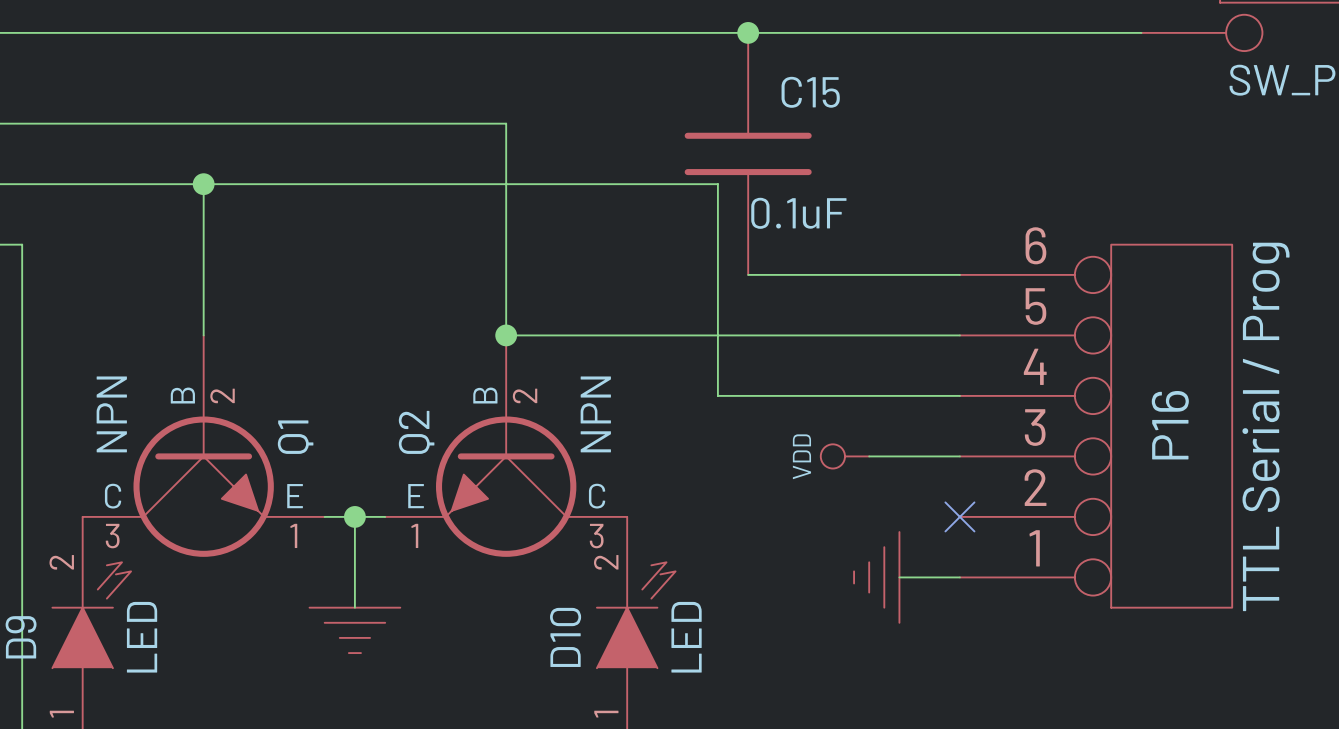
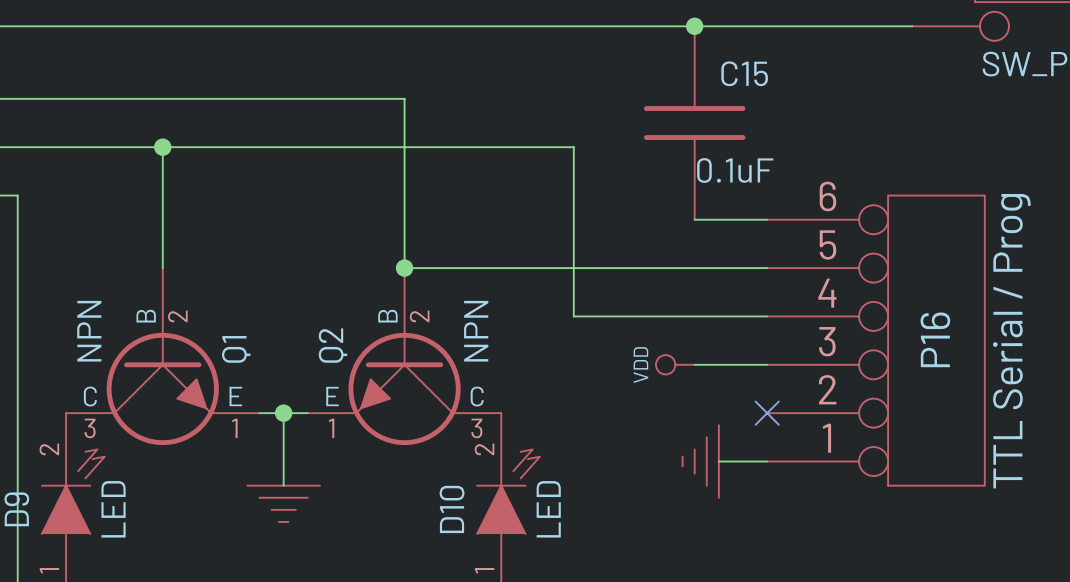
junction position: (748, 32) -> (694, 26)
C15 position: (748, 153) -> (694, 123)
wire: (748, 274) (869, 274) -> none

